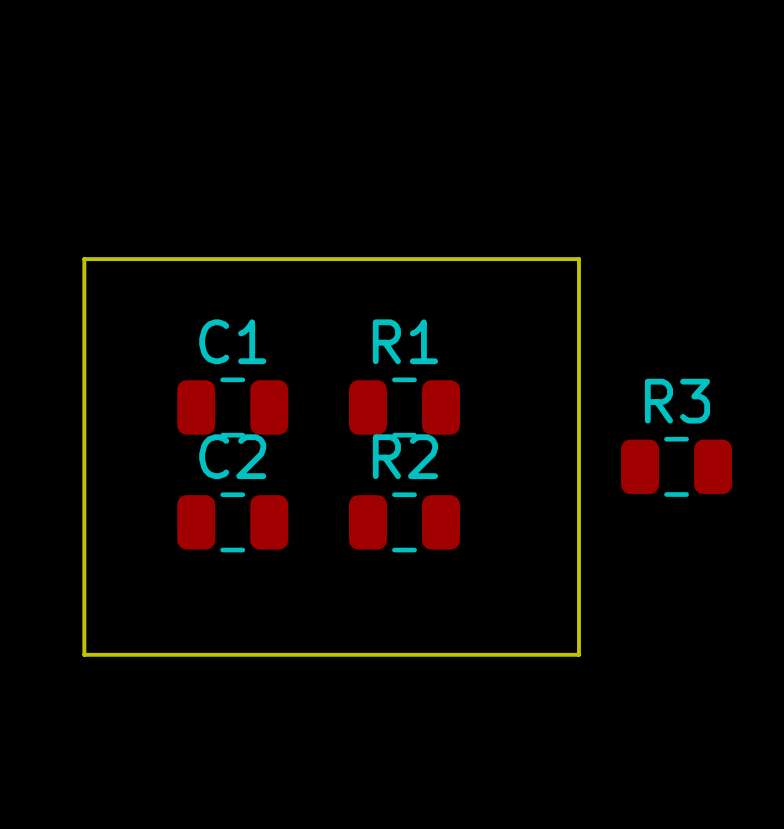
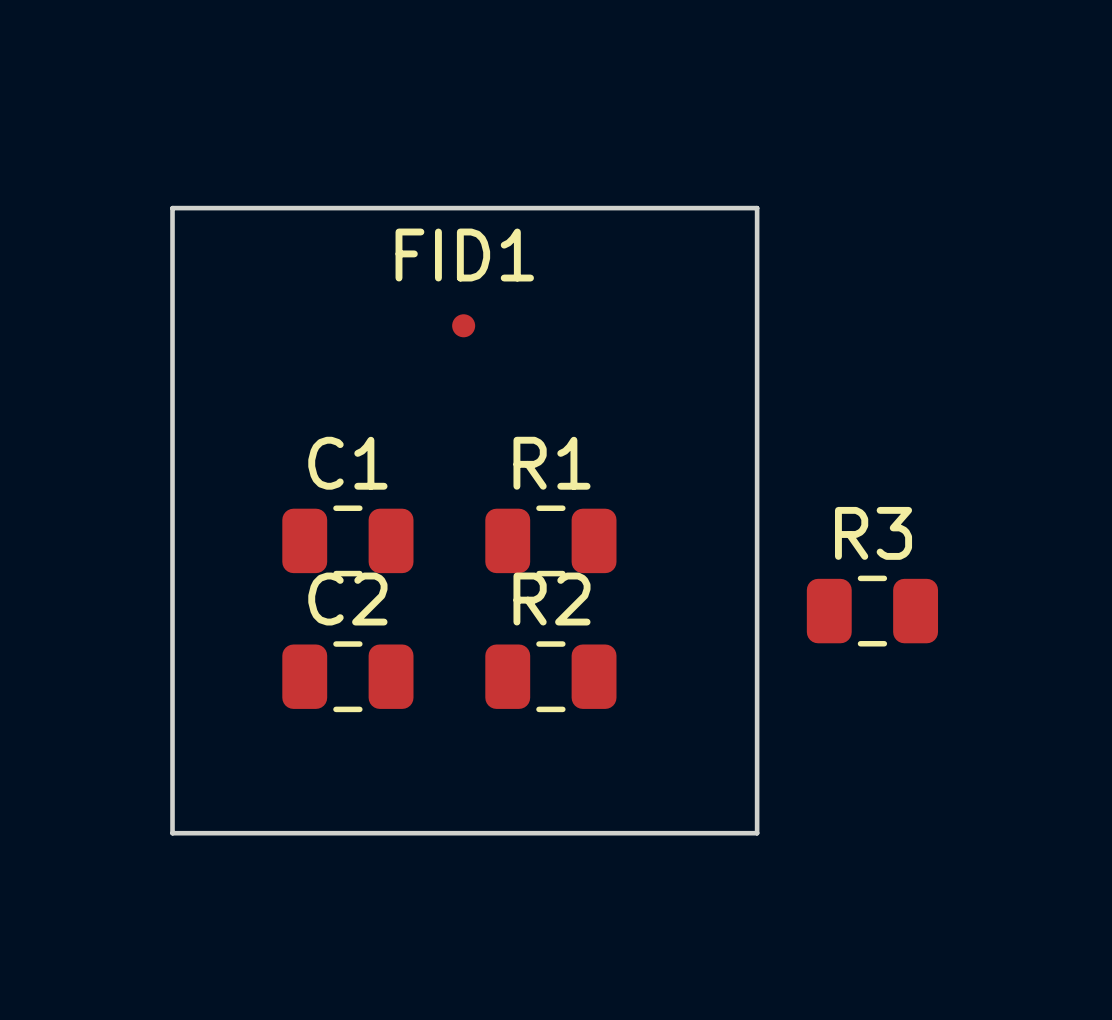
FID1: none -> (463, 325)
board edge: (84, 259) (578, 259) -> (172, 365) (172, 208) (757, 208) (757, 365)

